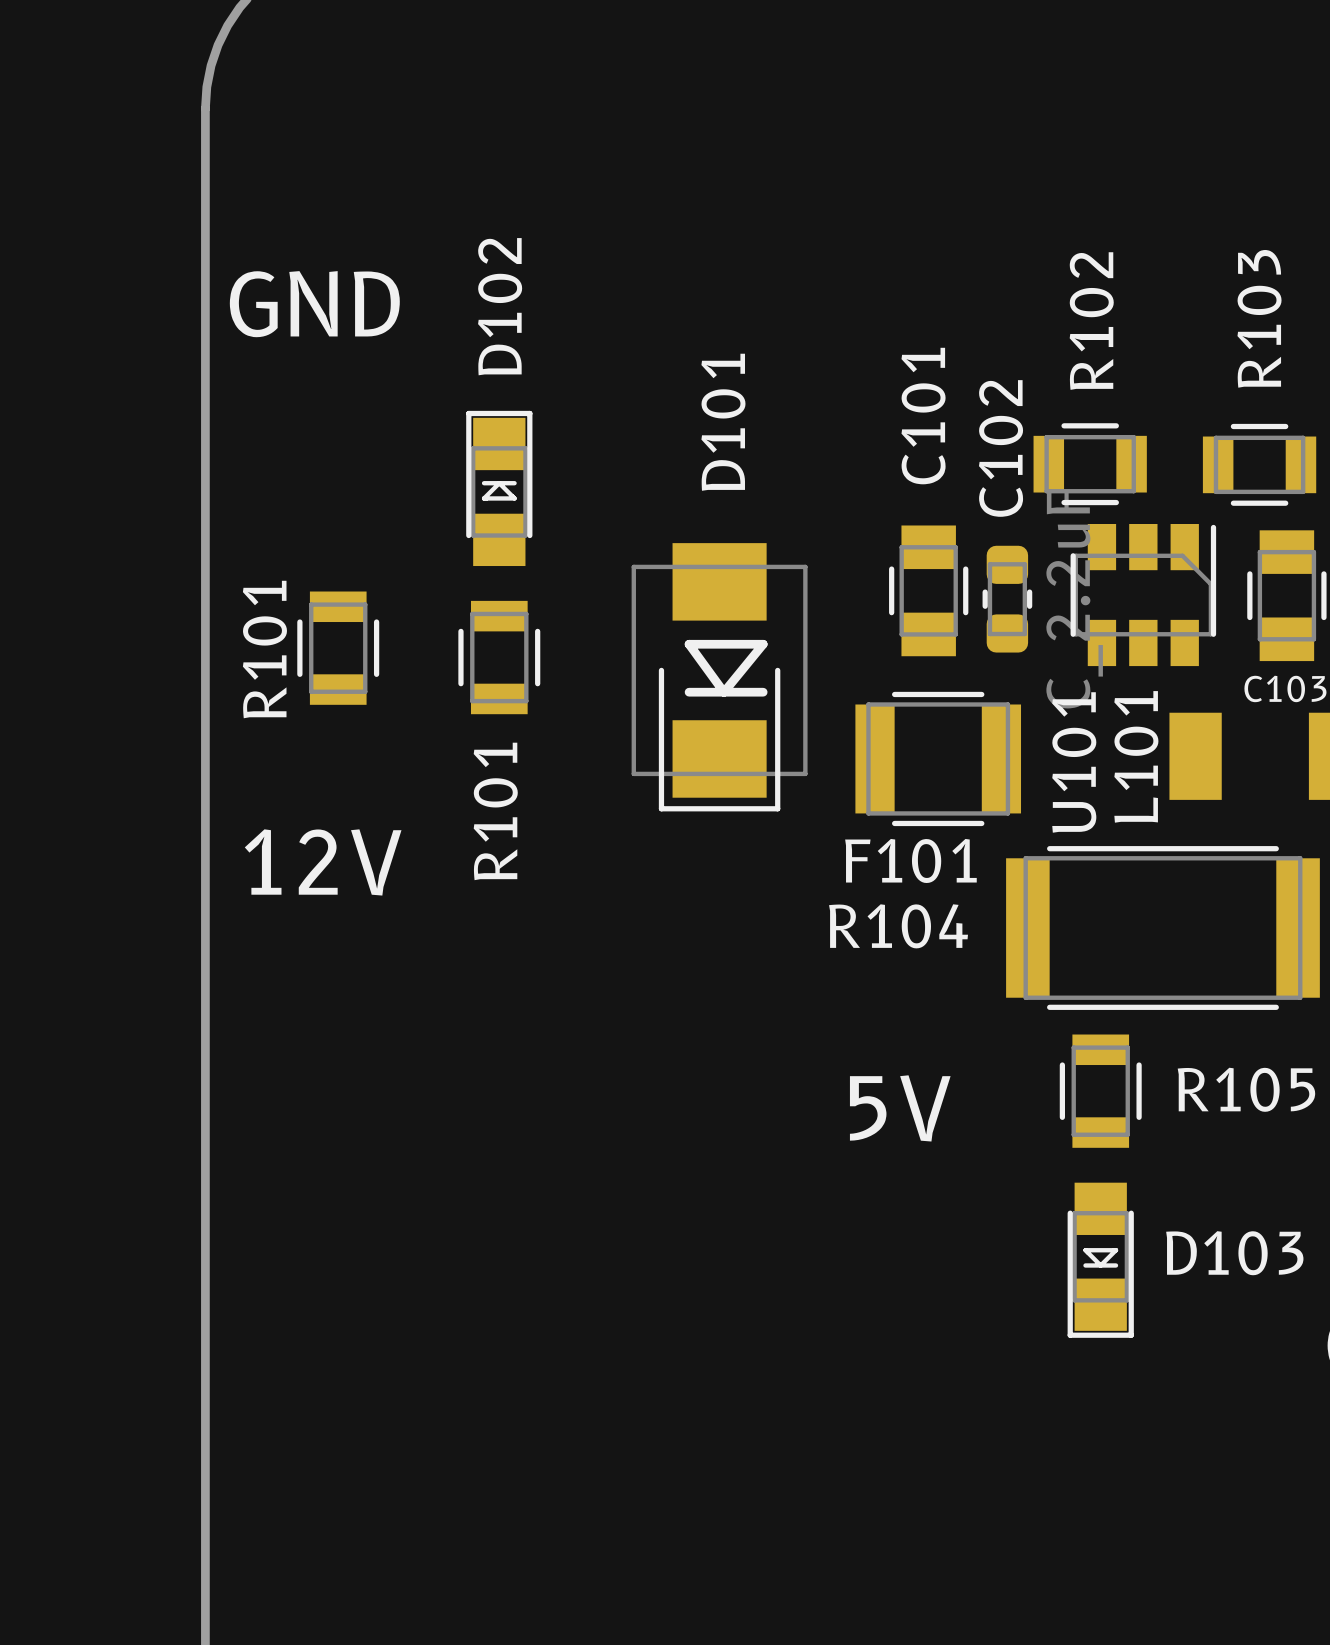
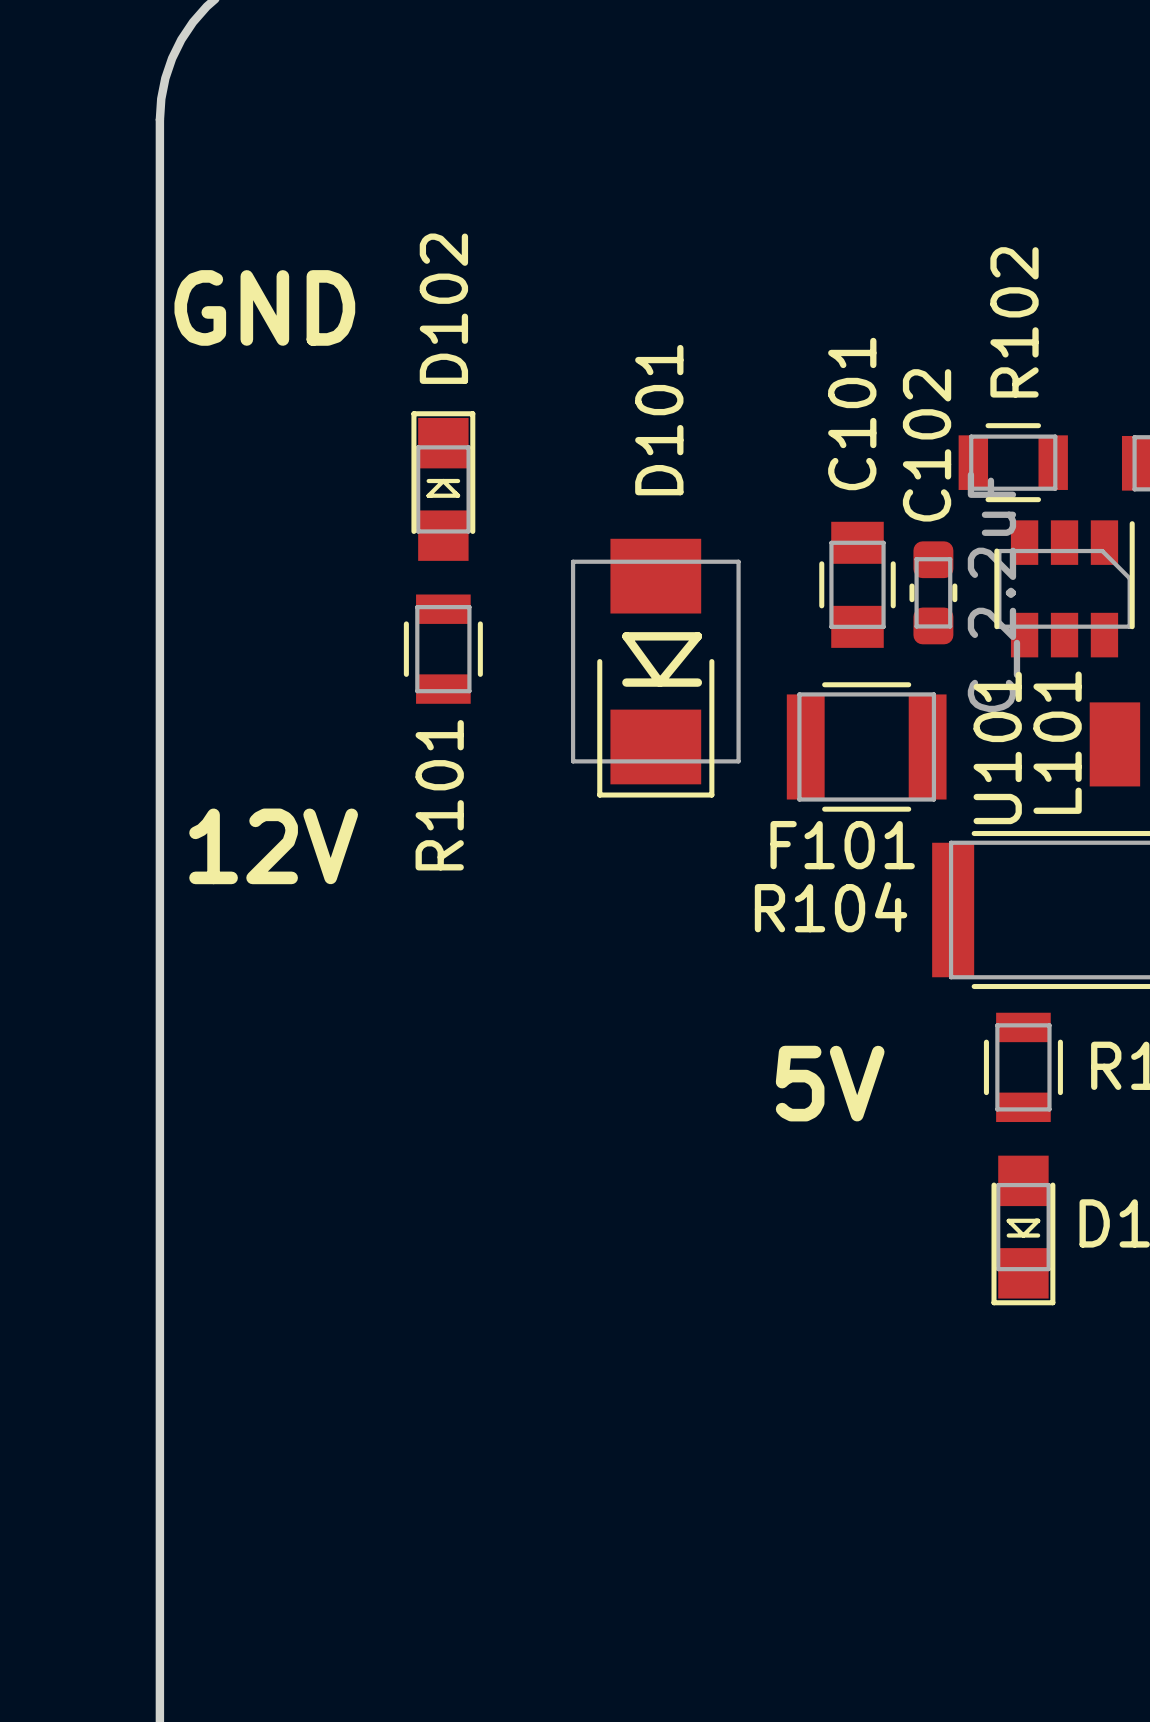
R101: (338, 648) -> none

